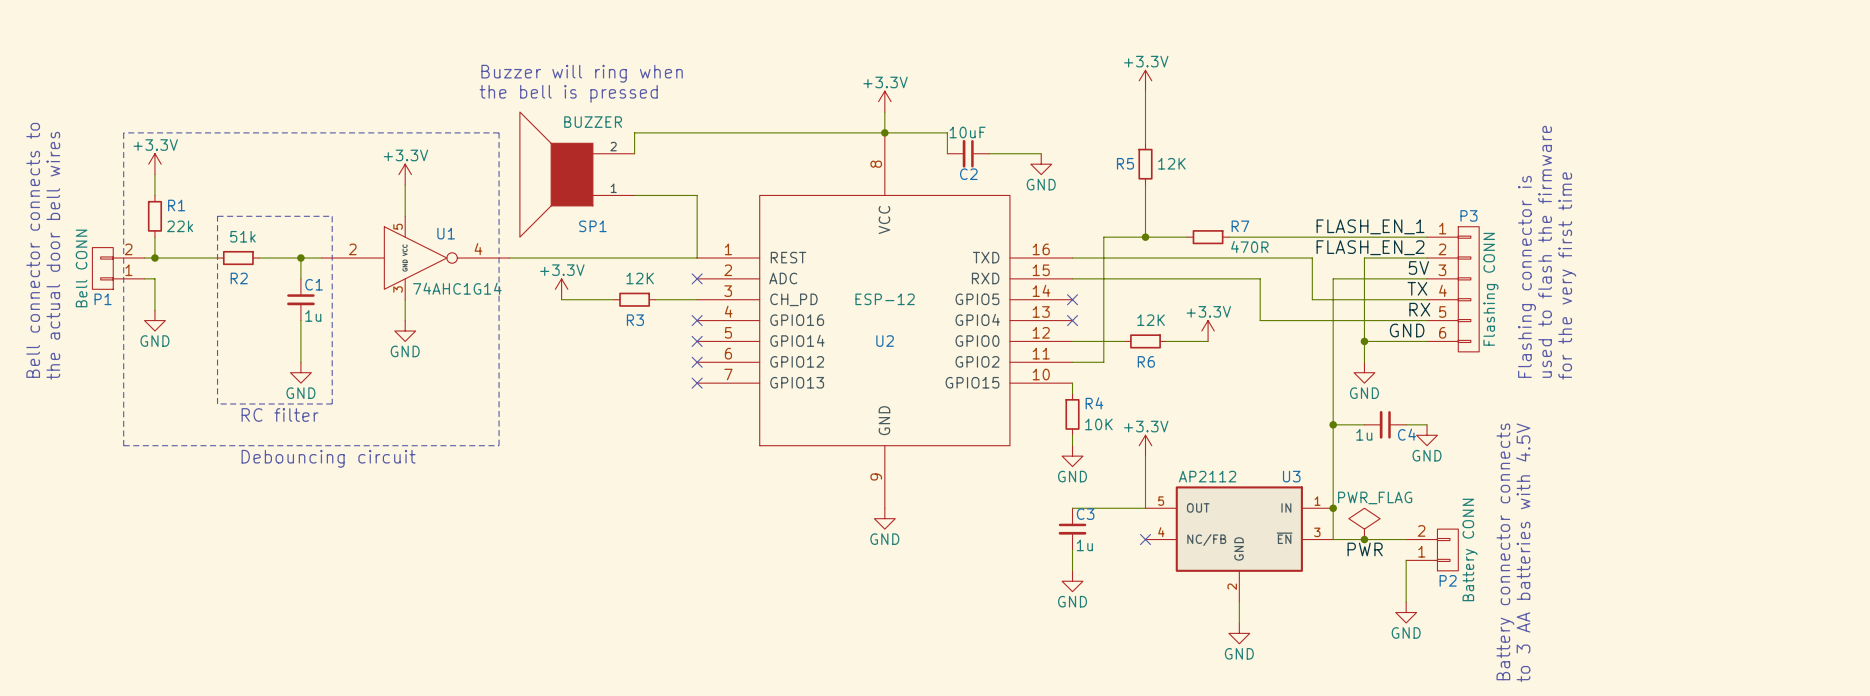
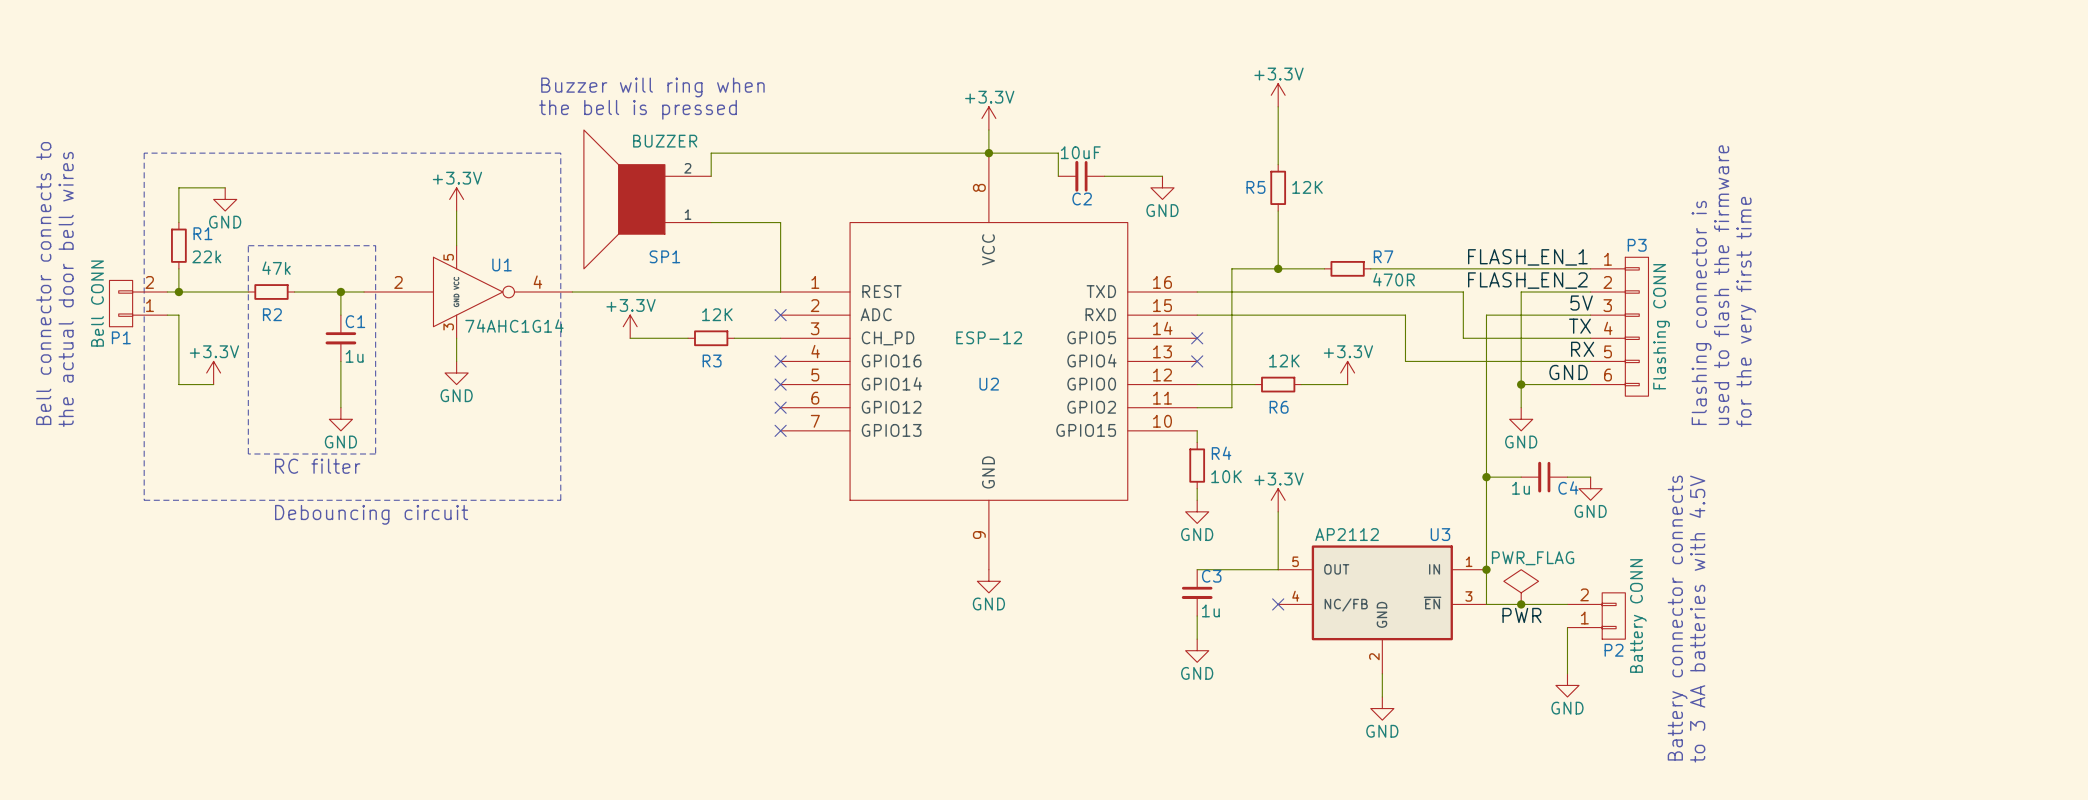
power symbol position: +3.3V (154, 164) -> +3.3V (213, 373)
wire: none -> (225, 187) (178, 187) (178, 199)
R2 value: 51k (242, 236) -> 47k (276, 268)
wire: none -> (178, 349) (178, 384) (213, 384)
power symbol position: GND (154, 320) -> GND (225, 199)

